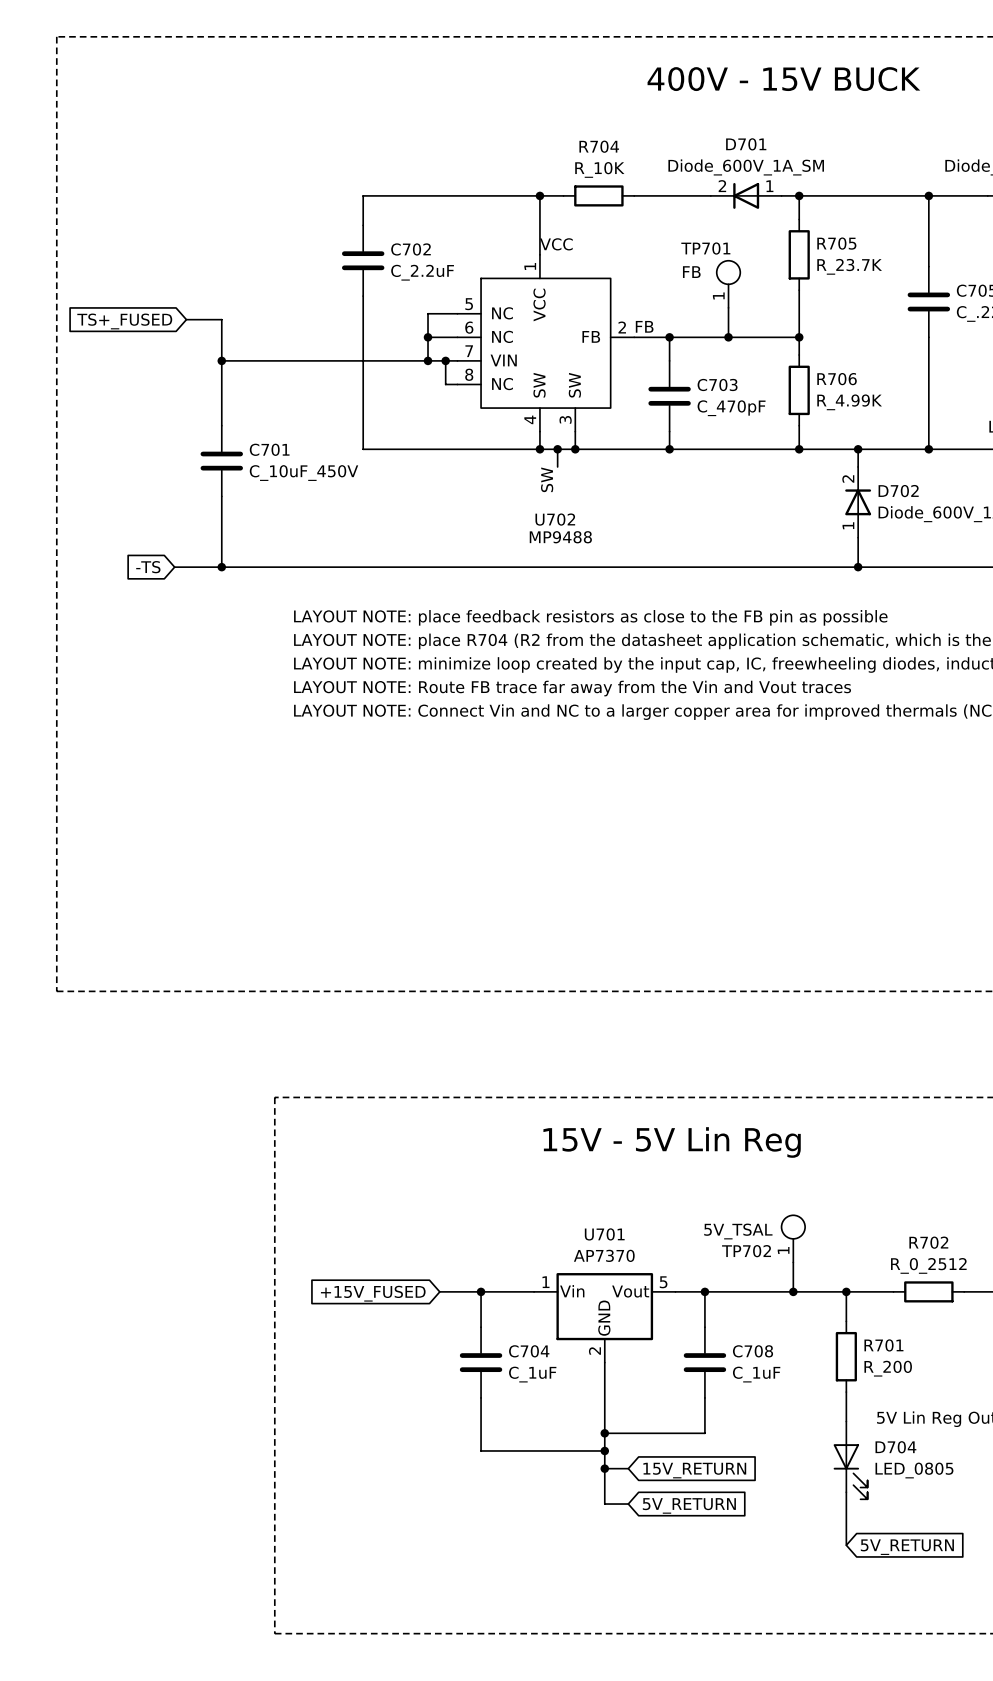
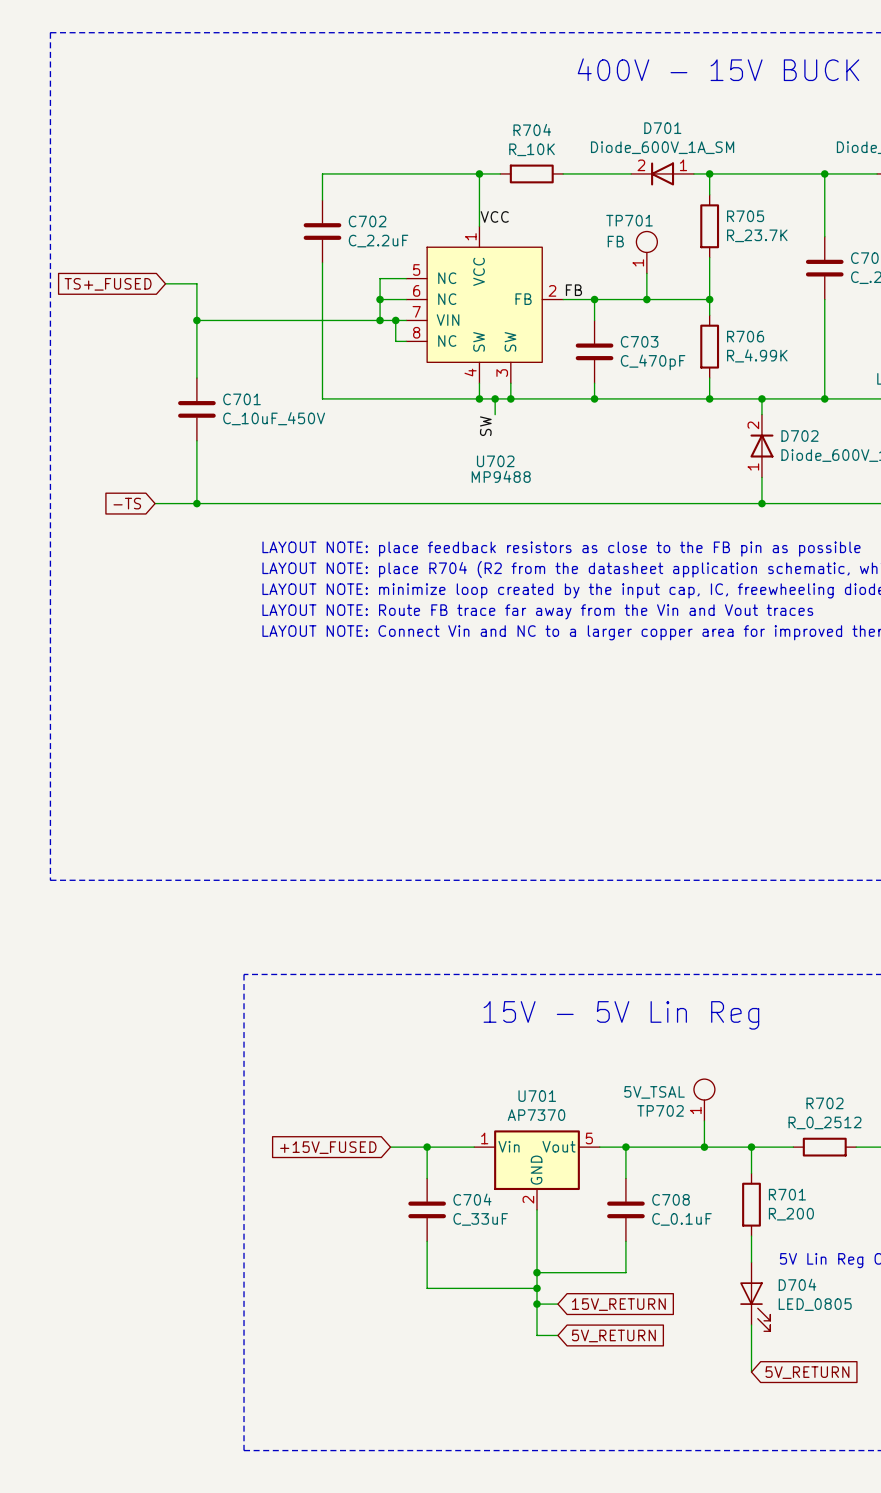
C704 value: C_1uF (532, 1374) -> C_33uF (480, 1219)
C708 value: C_1uF (756, 1374) -> C_0.1uF (681, 1219)

